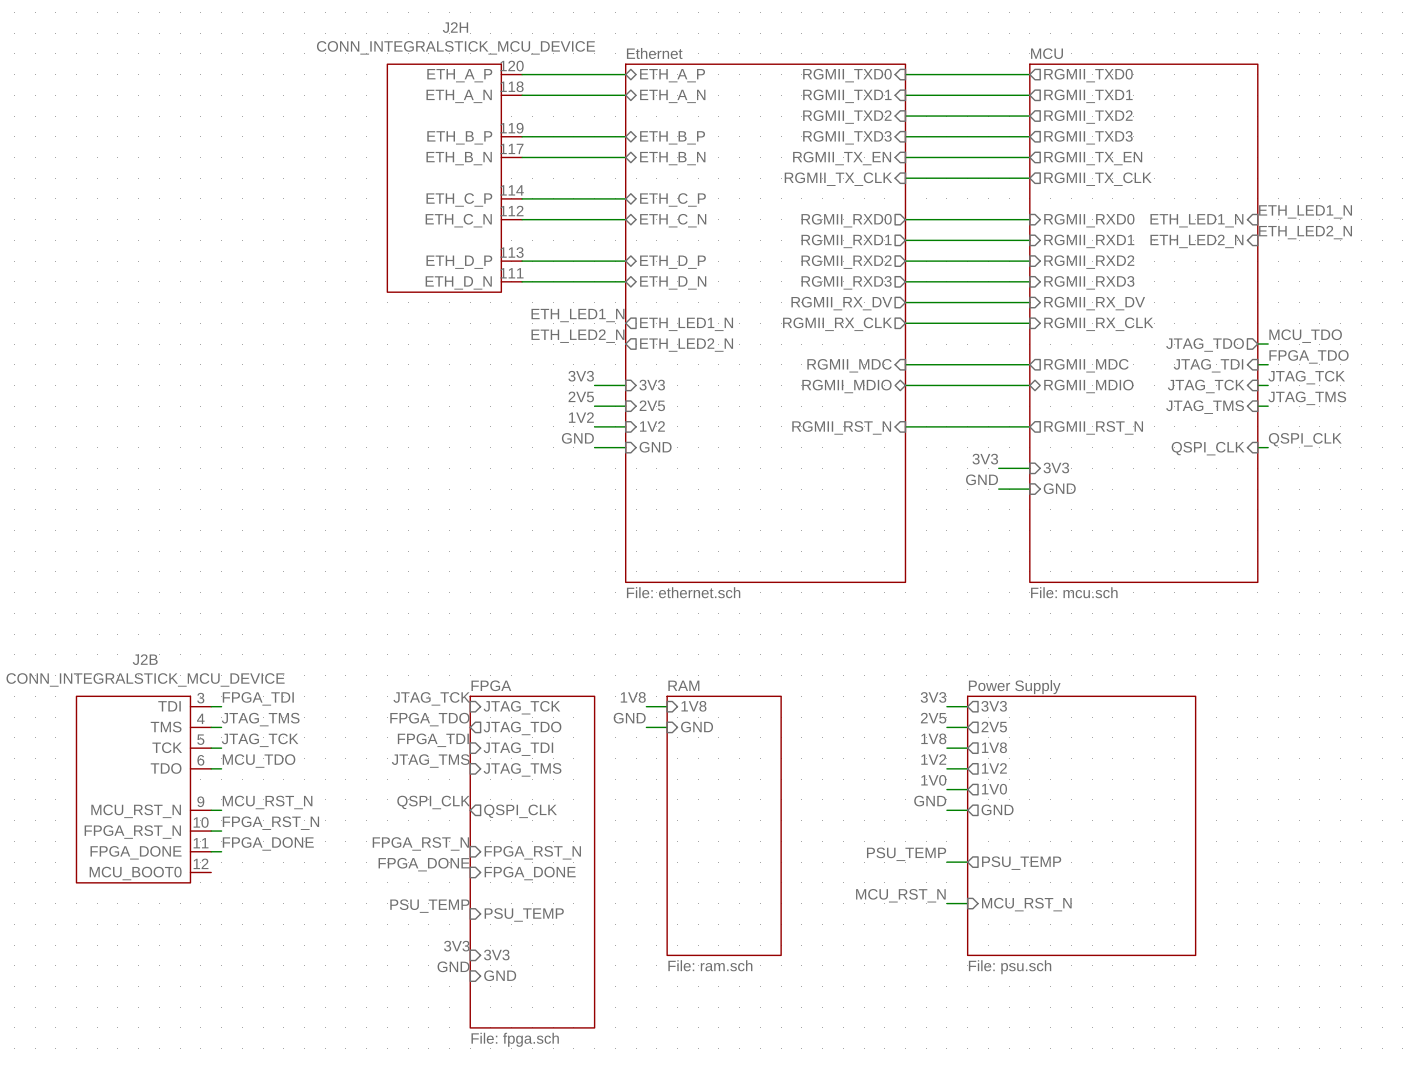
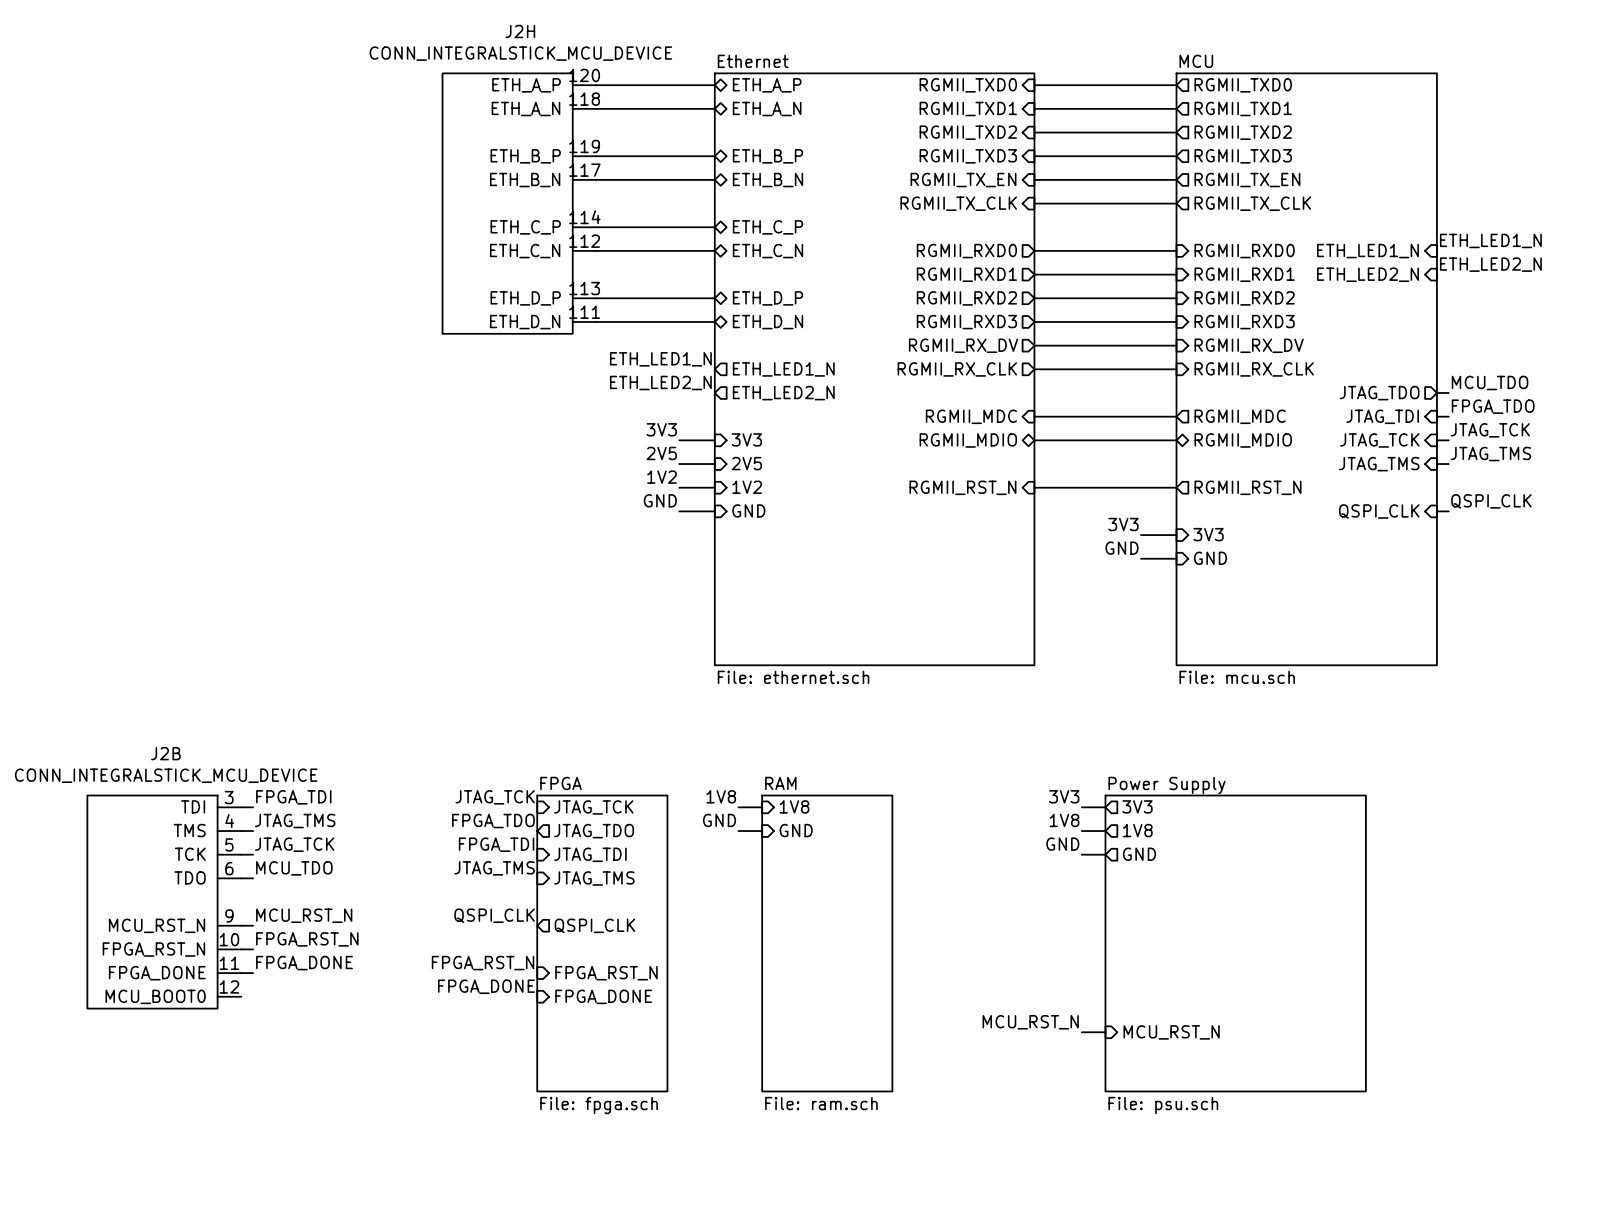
label: 2V5 (933, 718) -> 1V8 (1064, 820)
sheet pin: 2V5 (994, 727) -> 1V8 (1137, 830)
label: 1V8 (933, 738) -> GND (1062, 844)
sheet pin: 1V8 (994, 747) -> GND (1139, 854)
label: 1V2 (933, 759) -> none
wire: (946, 768) (967, 768) -> none
sheet pin: 1V2 (994, 768) -> none
label: 1V0 (933, 780) -> none
wire: (946, 789) (967, 789) -> none
sheet pin: 1V0 (994, 789) -> none
label: GND (930, 801) -> none
sheet pin: GND (997, 809) -> none
wire: (946, 810) (967, 810) -> none
sheet FPGA: none -> File: fpga.sch (602, 943)
label: PSU_TEMP (906, 854) -> none
sheet FPGA: File: fpga.sch (532, 862) -> none
wire: (946, 862) (967, 862) -> none
sheet pin: PSU_TEMP (1021, 863) -> none
label: PSU_TEMP (429, 906) -> none
sheet pin: PSU_TEMP (524, 914) -> none
label: 3V3 (456, 946) -> none
sheet pin: 3V3 (496, 954) -> none
label: GND (453, 966) -> none
sheet pin: GND (500, 975) -> none

